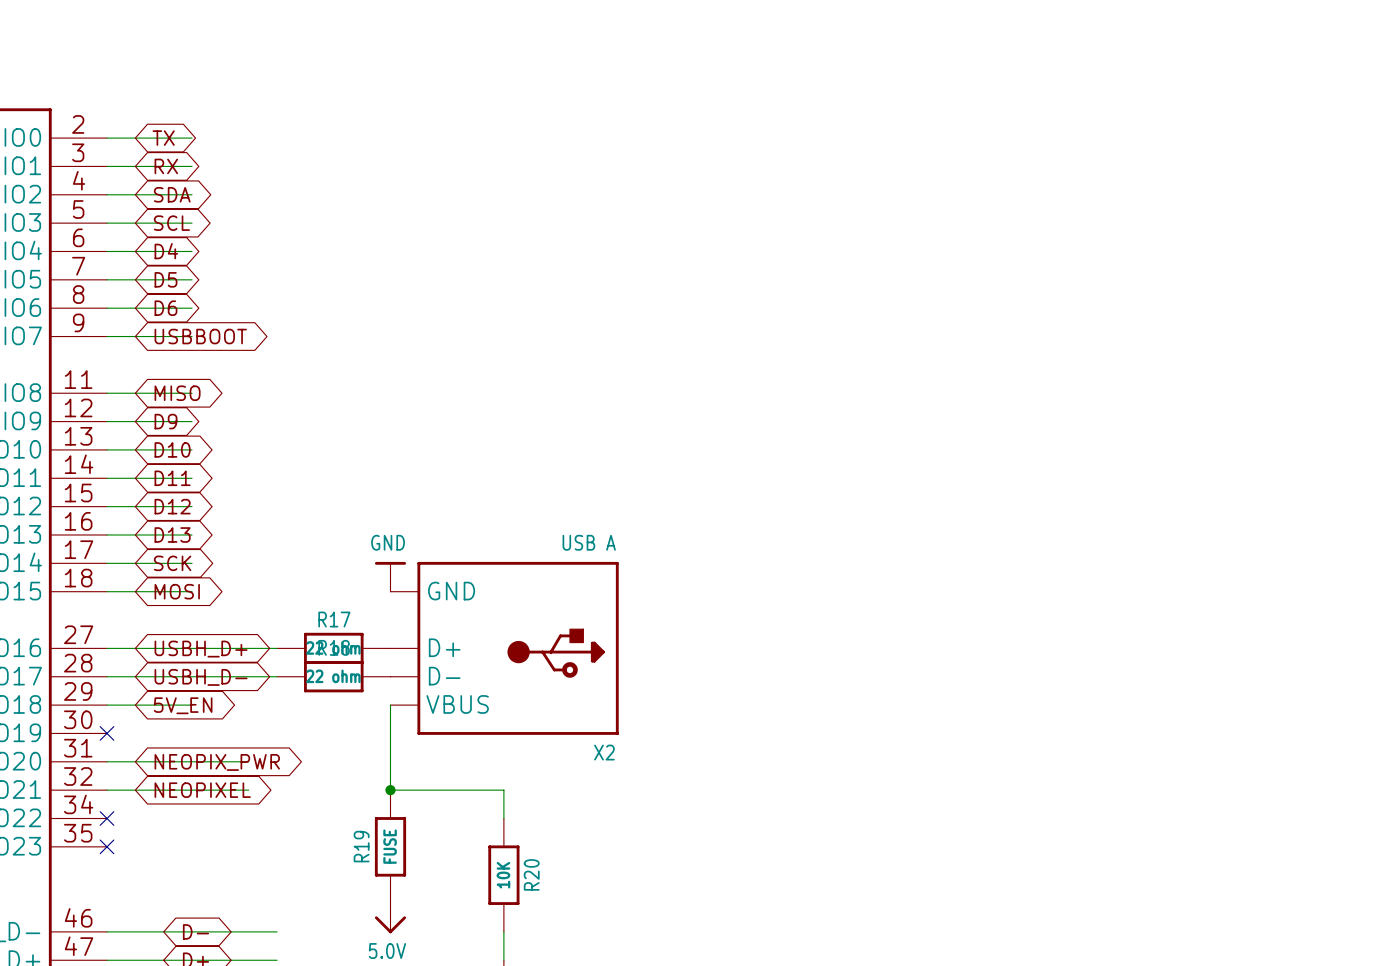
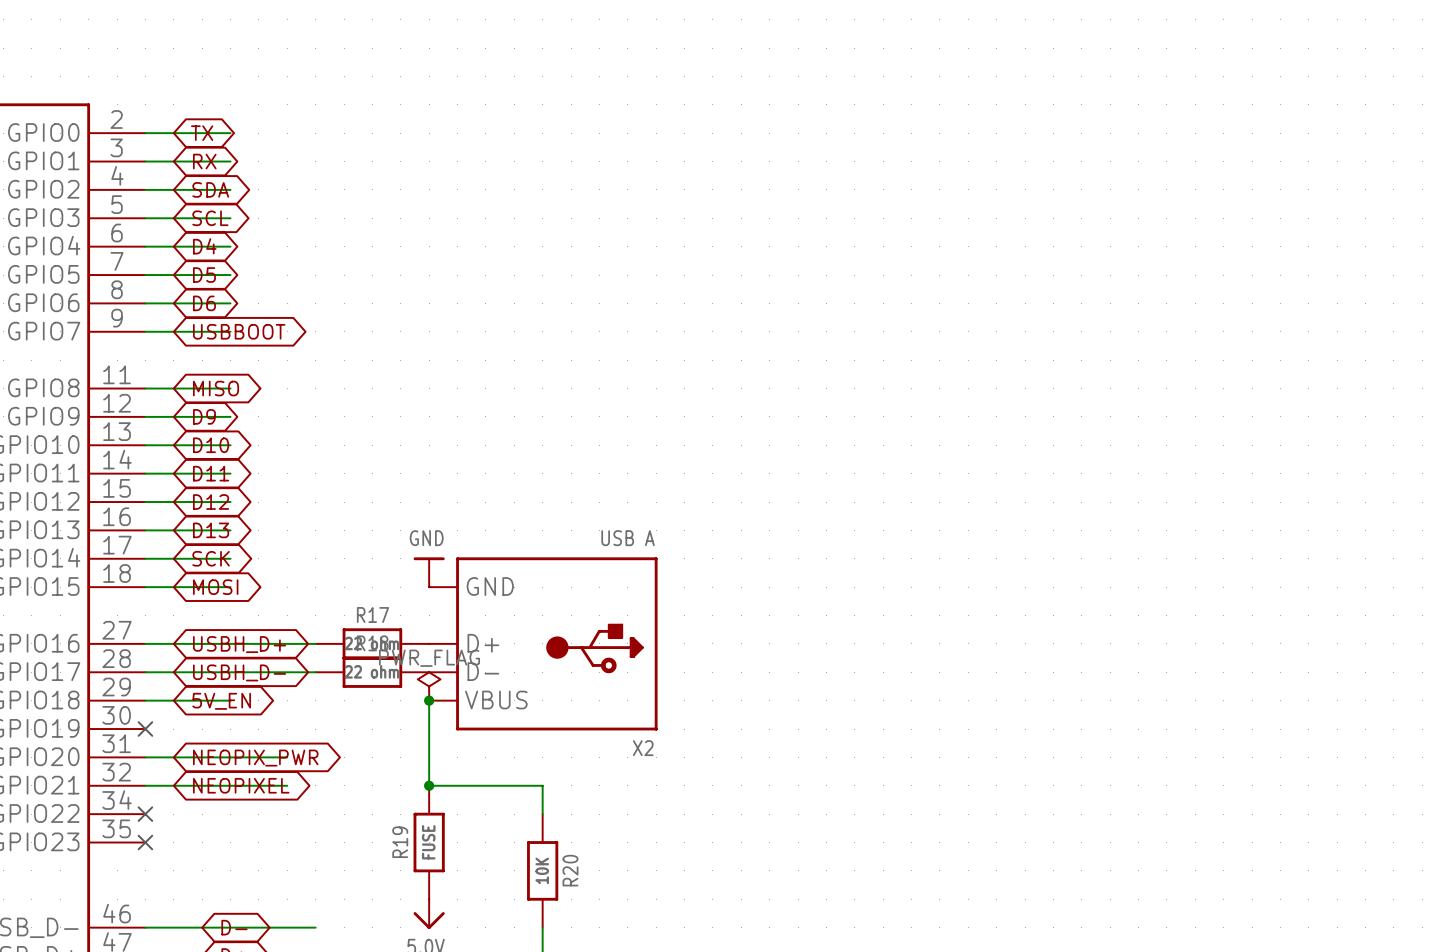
power symbol: none -> PWR_FLAG (429, 686)
junction: none -> (429, 700)

